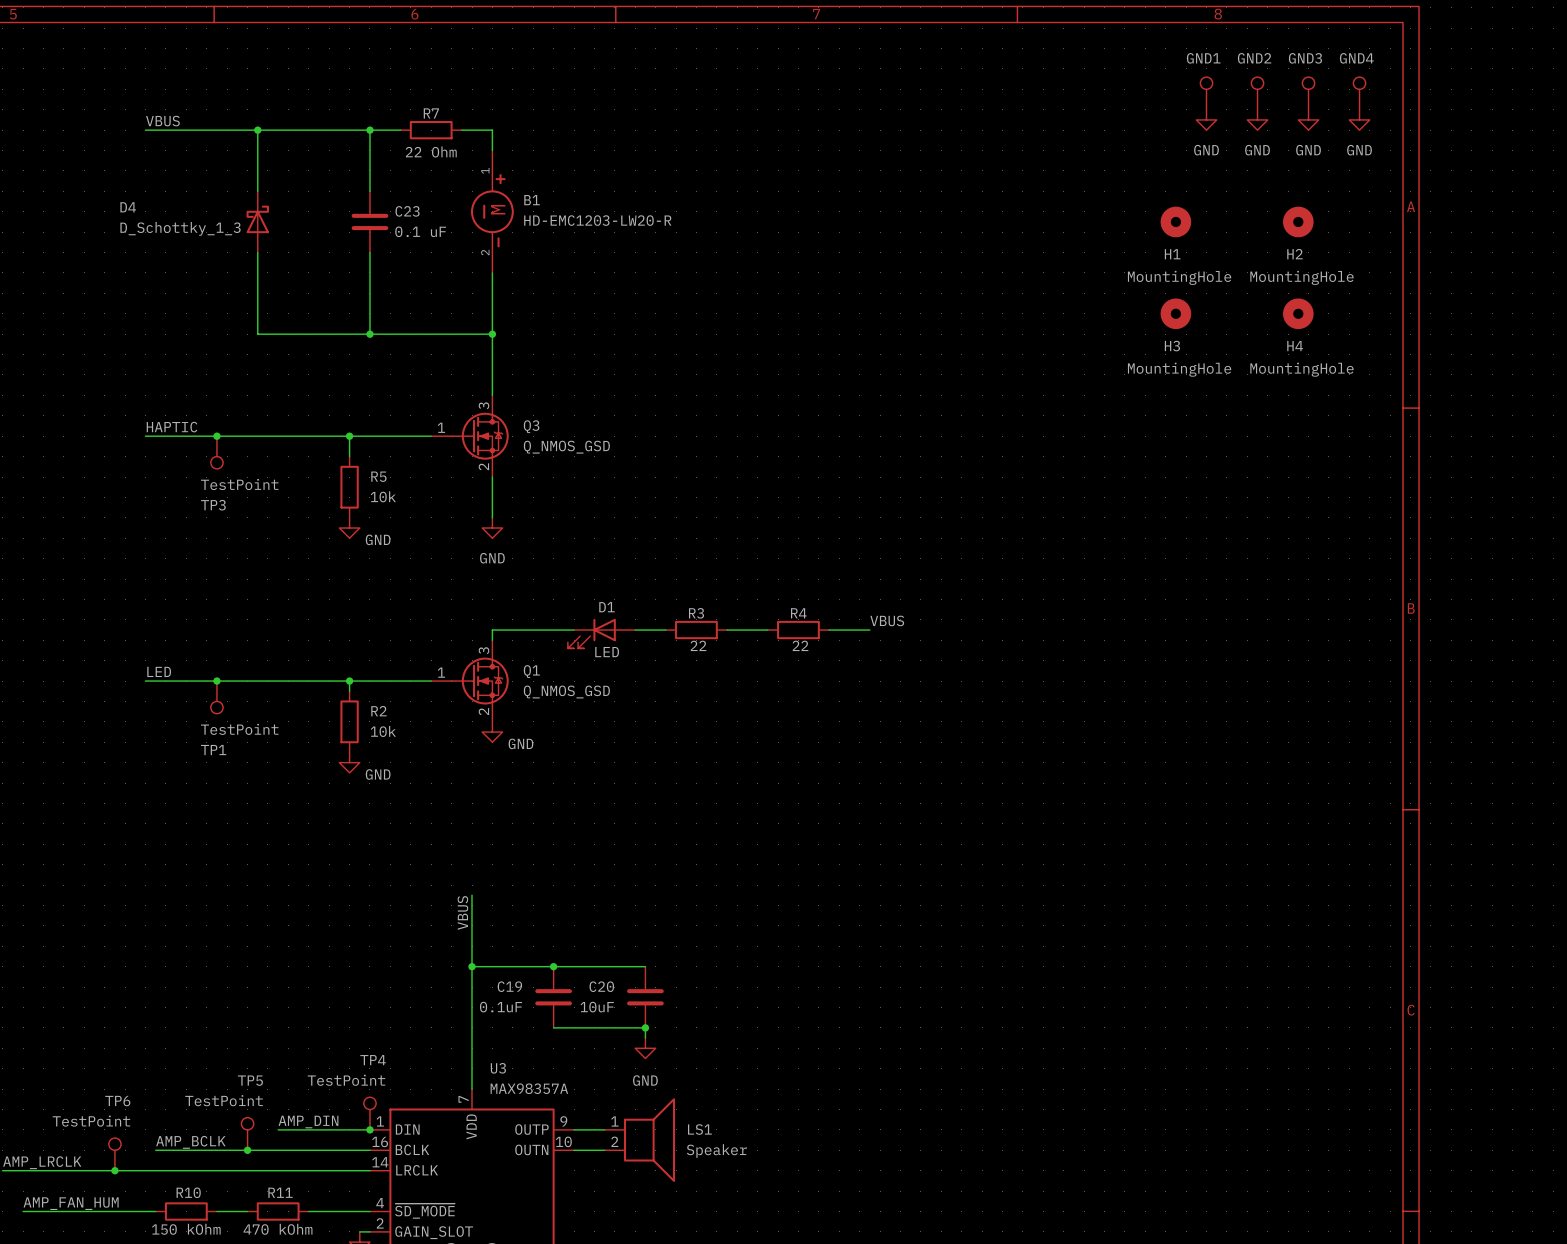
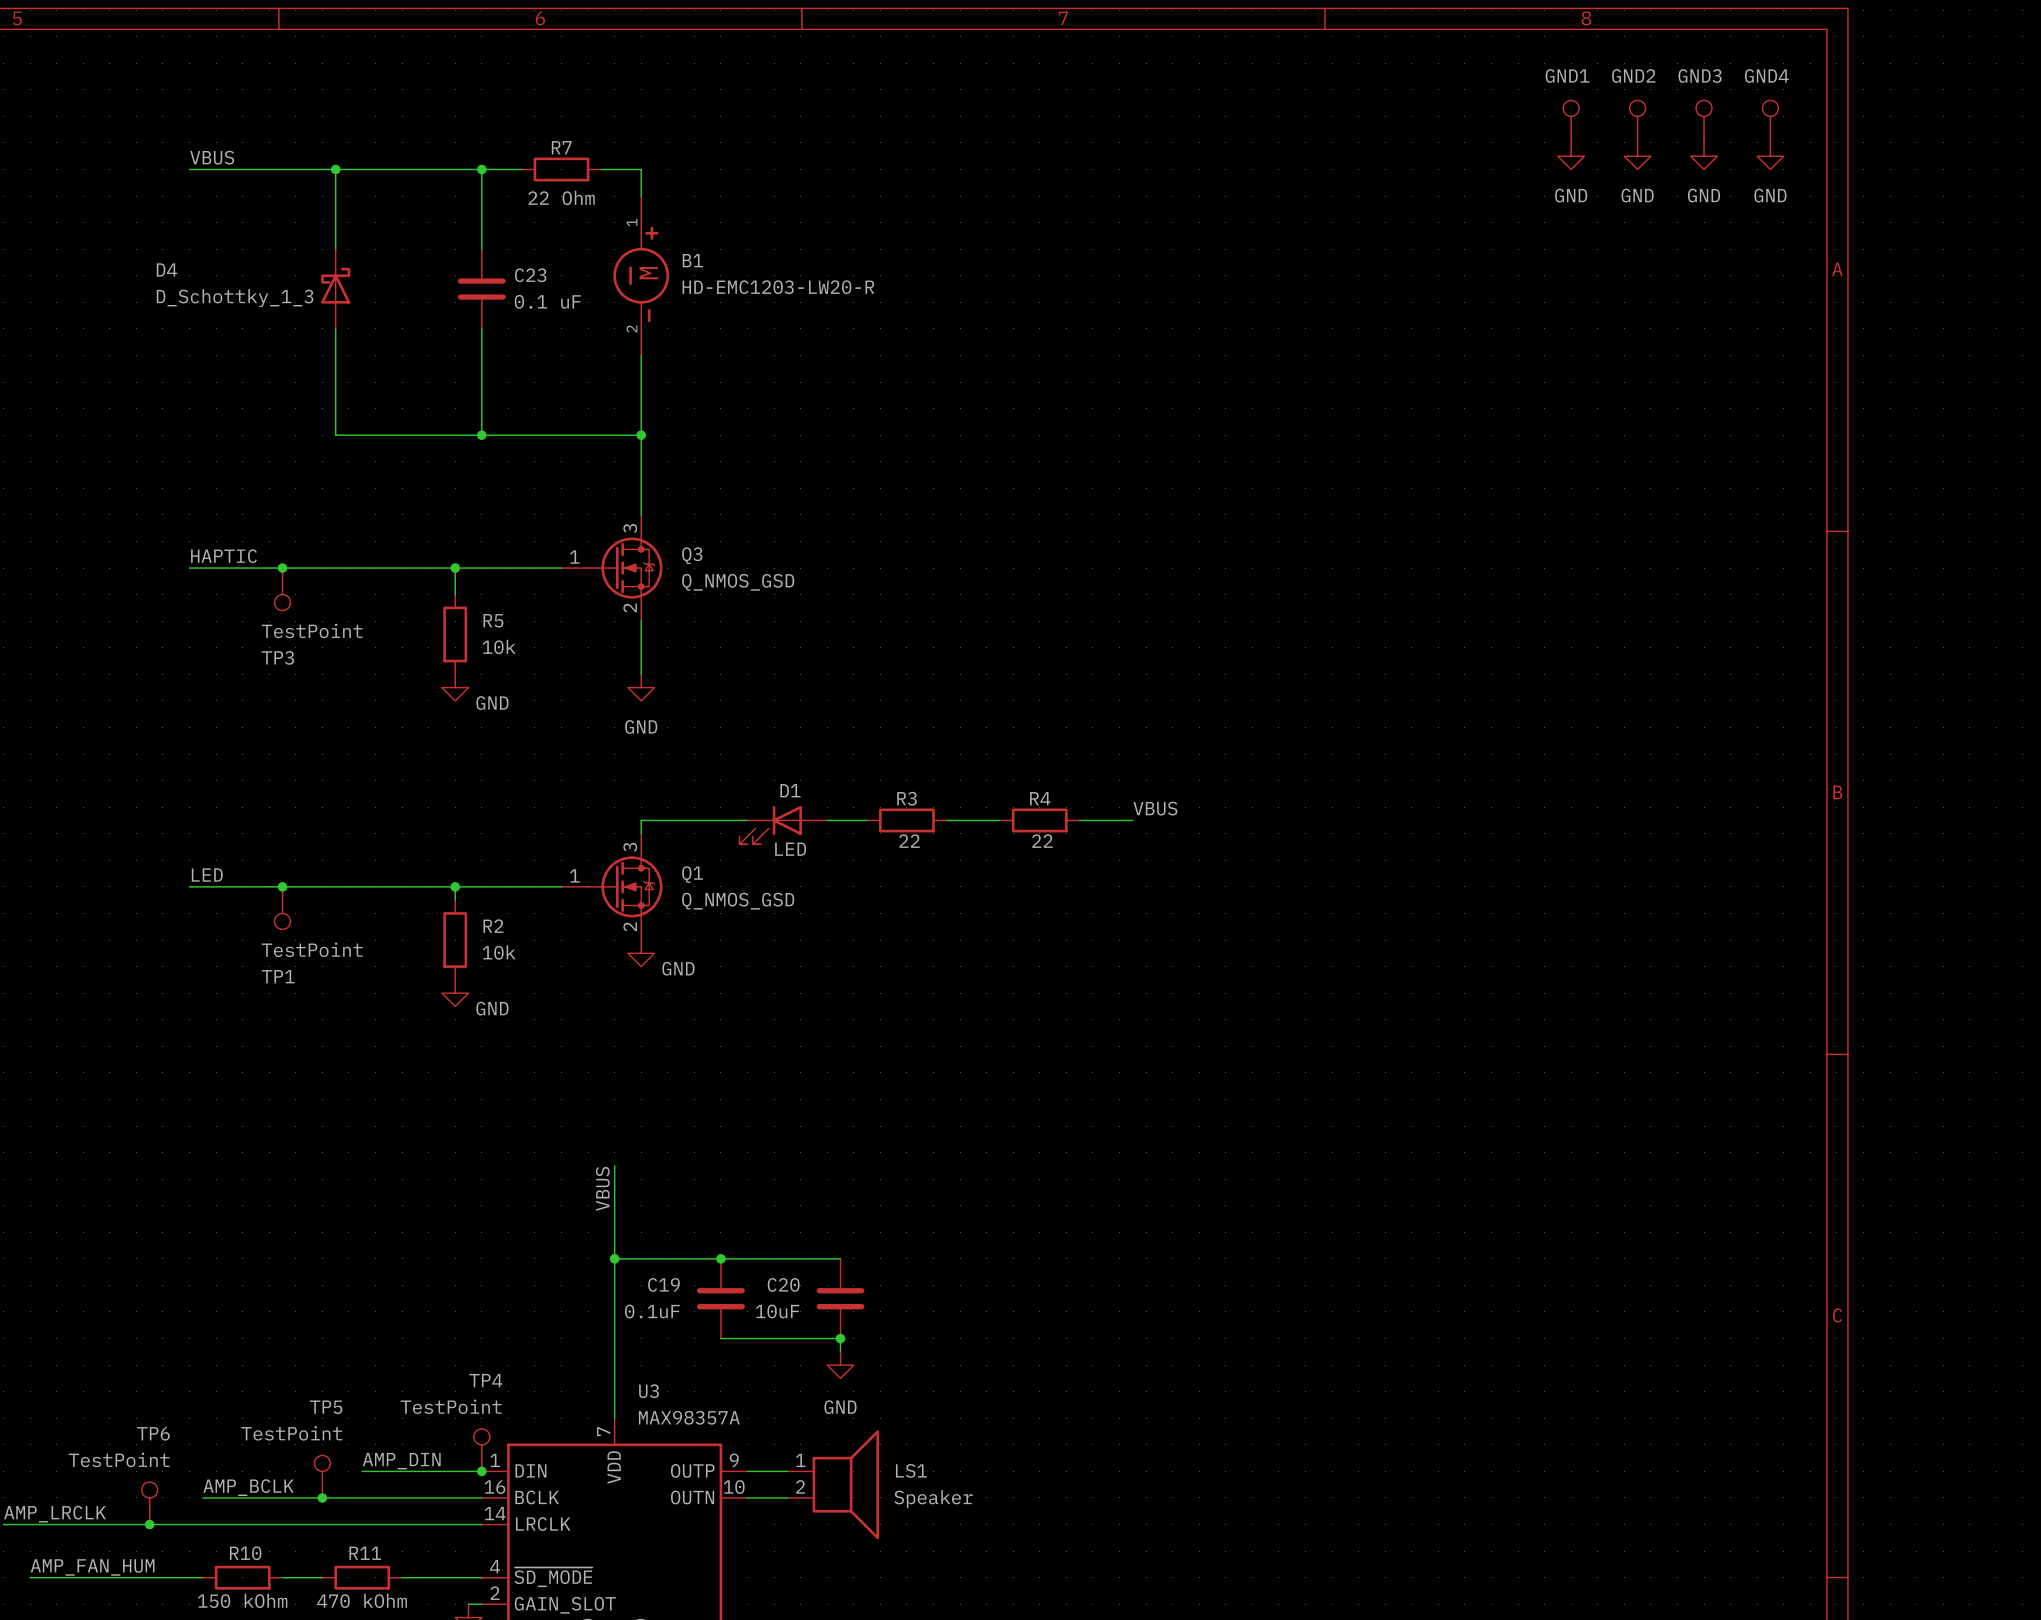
H1: MountingHole (1175, 221) -> none
H2: MountingHole (1298, 221) -> none
H3: MountingHole (1175, 313) -> none
H4: MountingHole (1298, 313) -> none

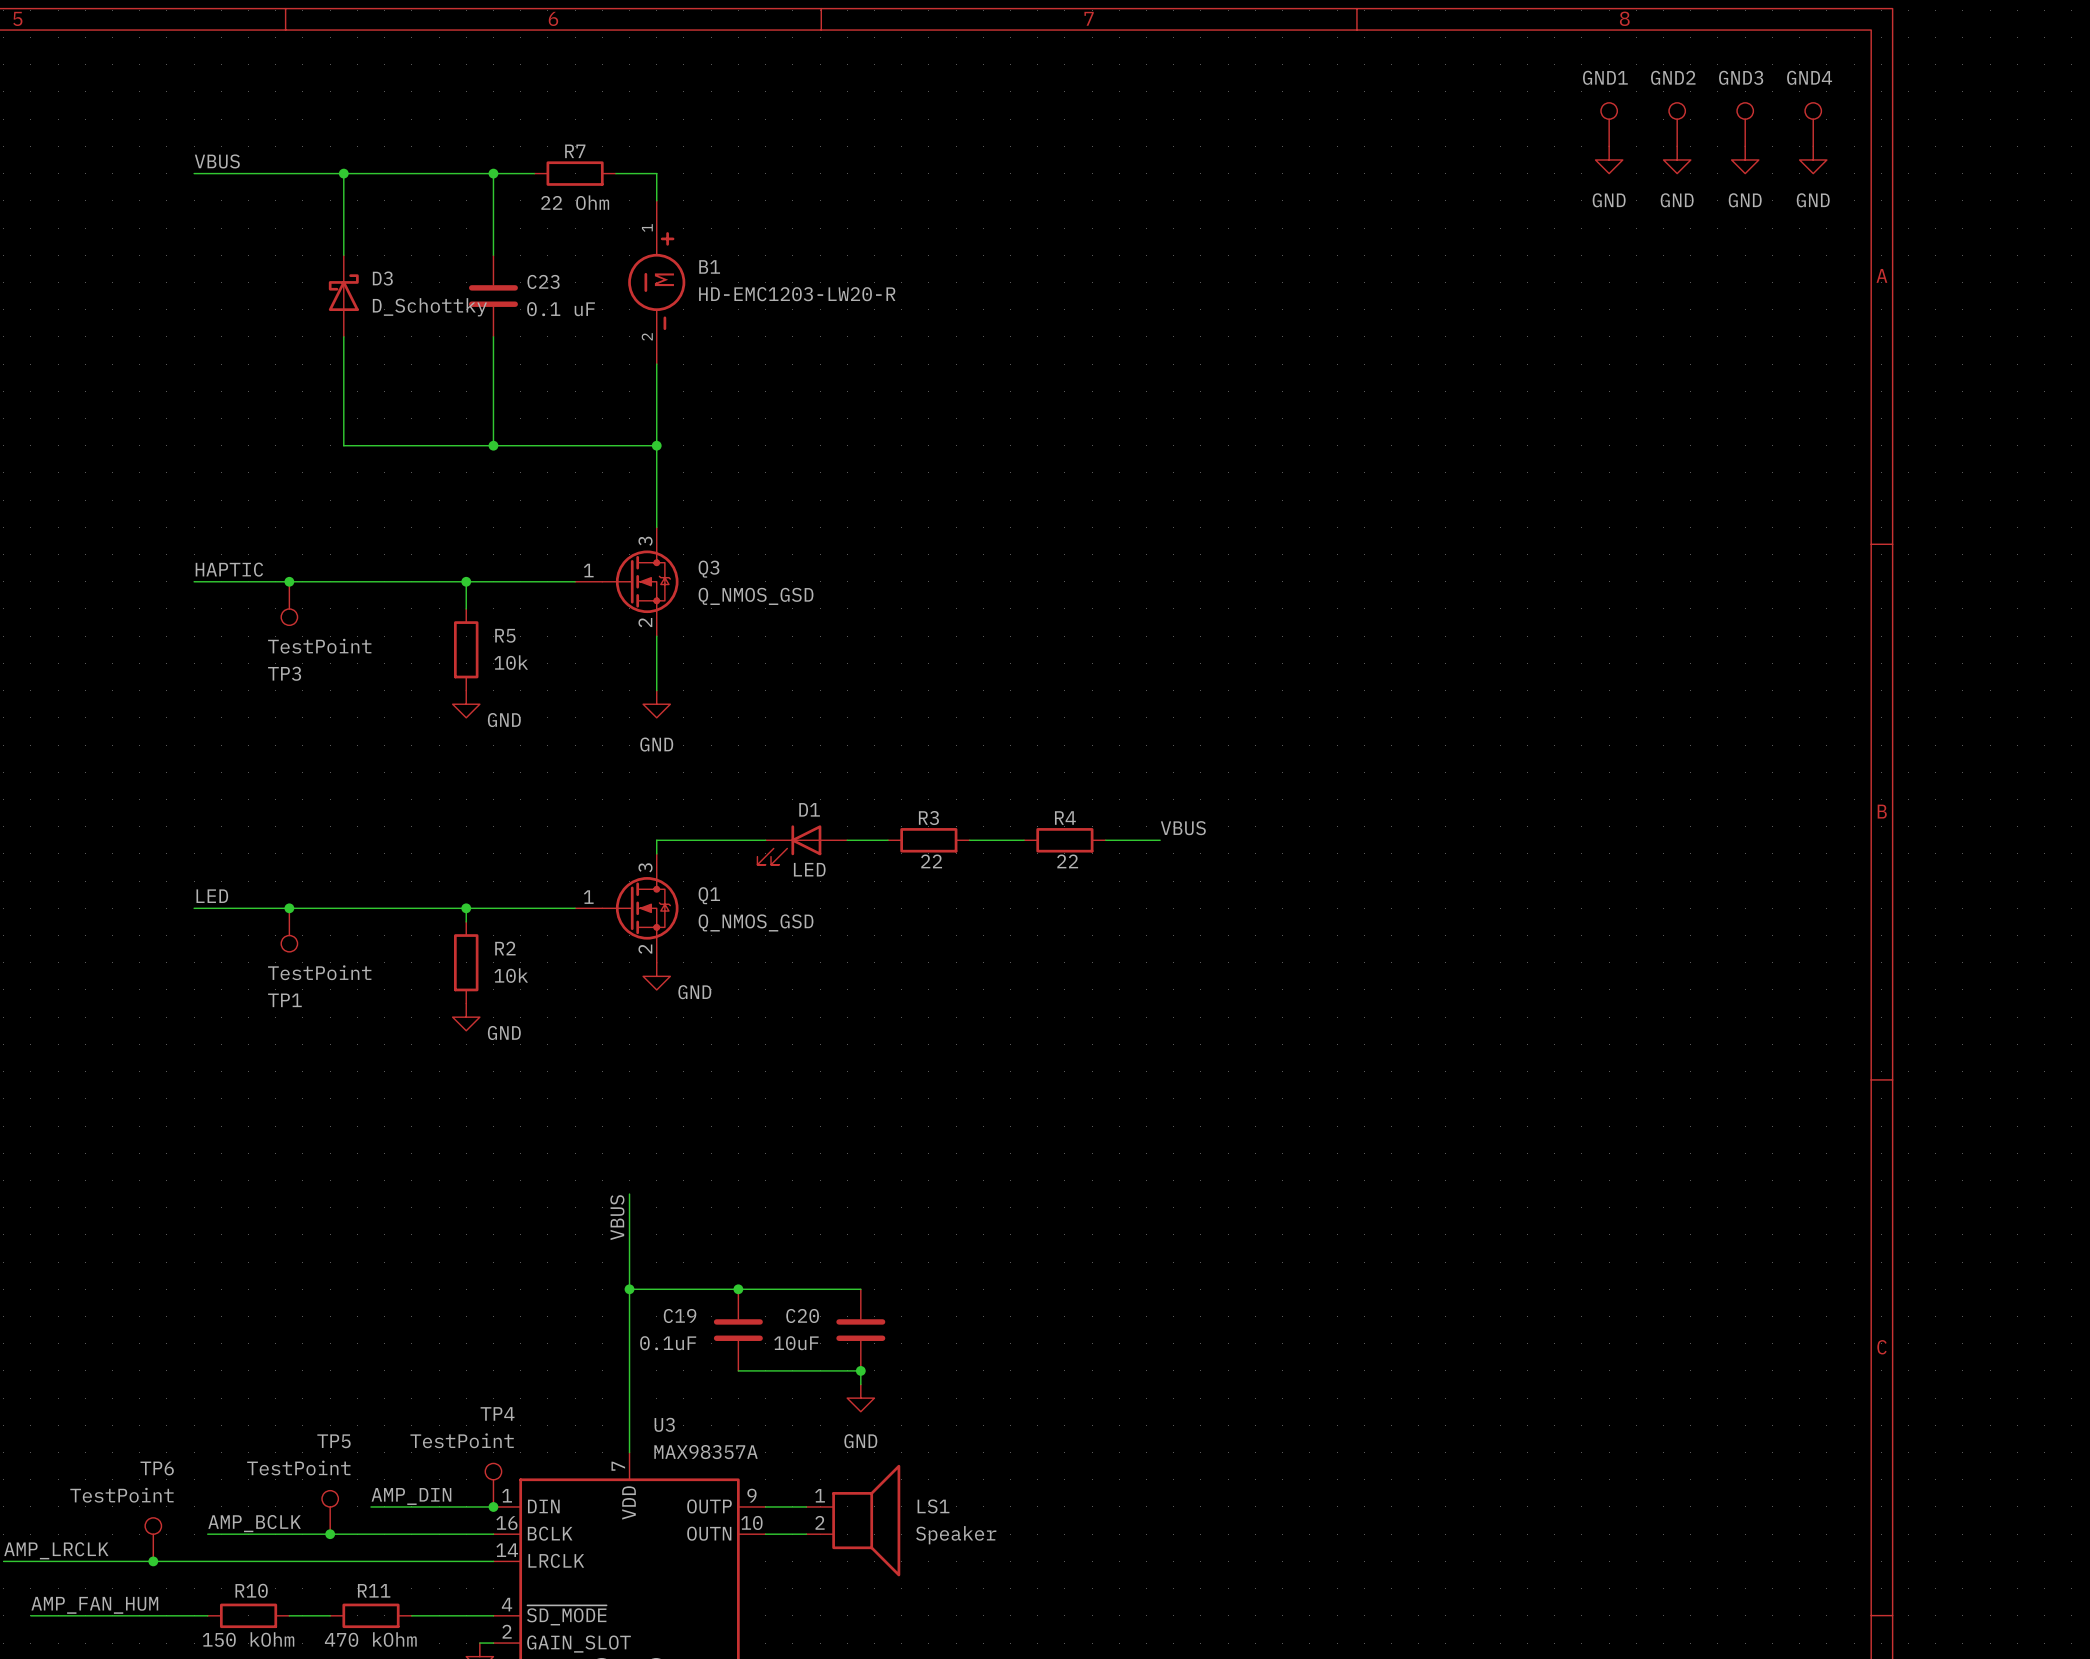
D4 name: D4 (166, 269) -> D3 (382, 278)
D4 value: D_Schottky_1_3 (235, 298) -> D_Schottky (429, 307)

